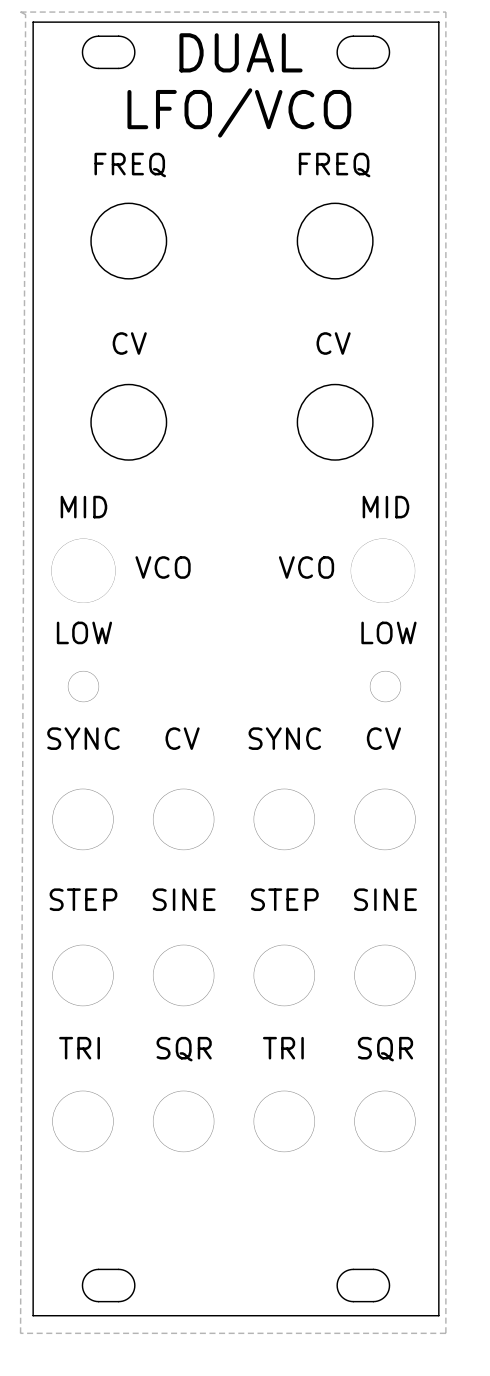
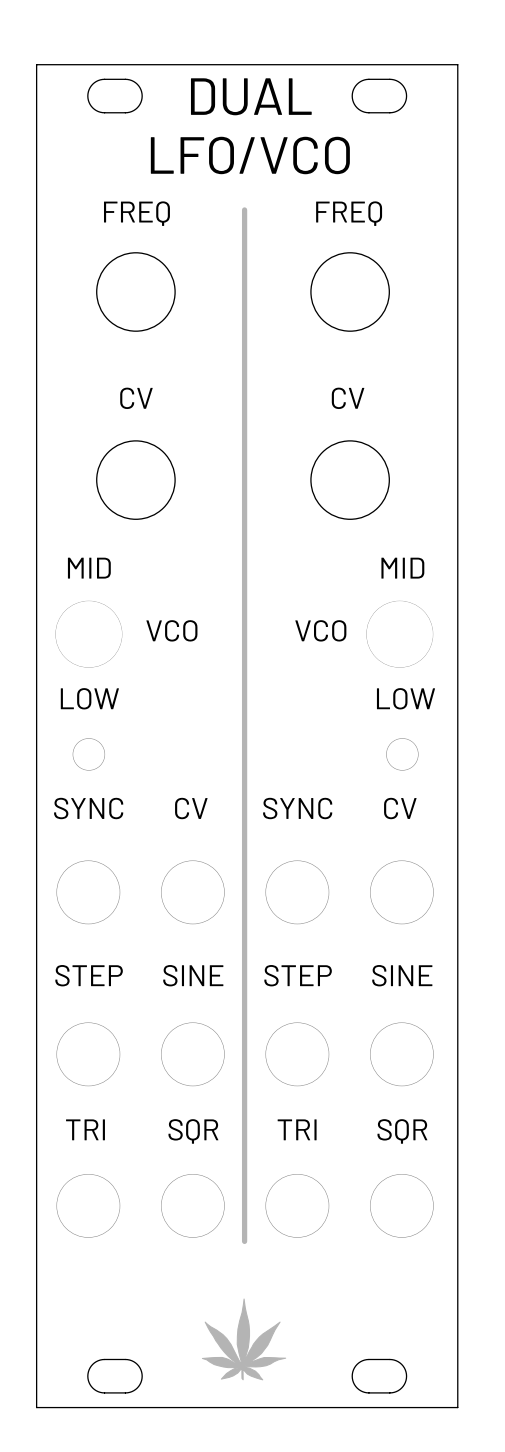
zone outline: (20, 12) (25, 14) (20, 1333) (445, 1333) (445, 12) (20, 12) -> none
track: none -> (244, 209) (244, 1241)
drawing: none -> [201, 1298, 287, 1381]

